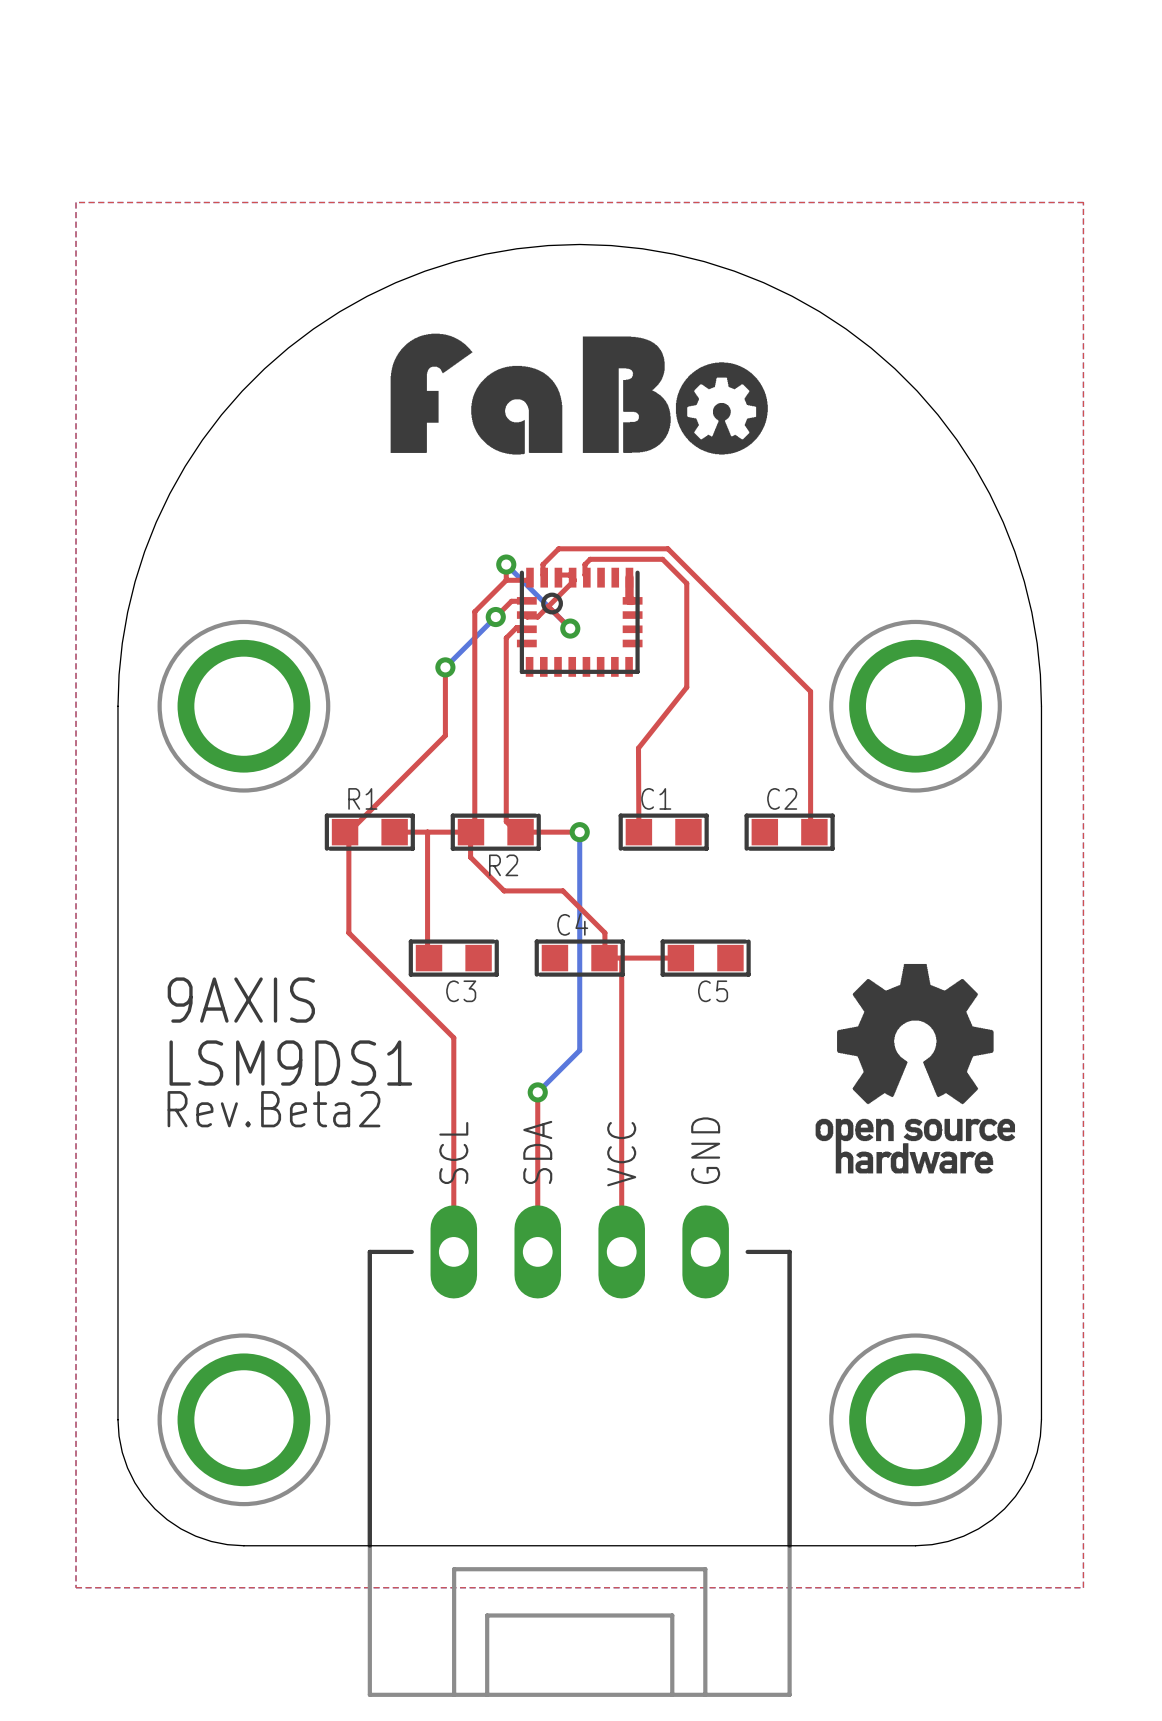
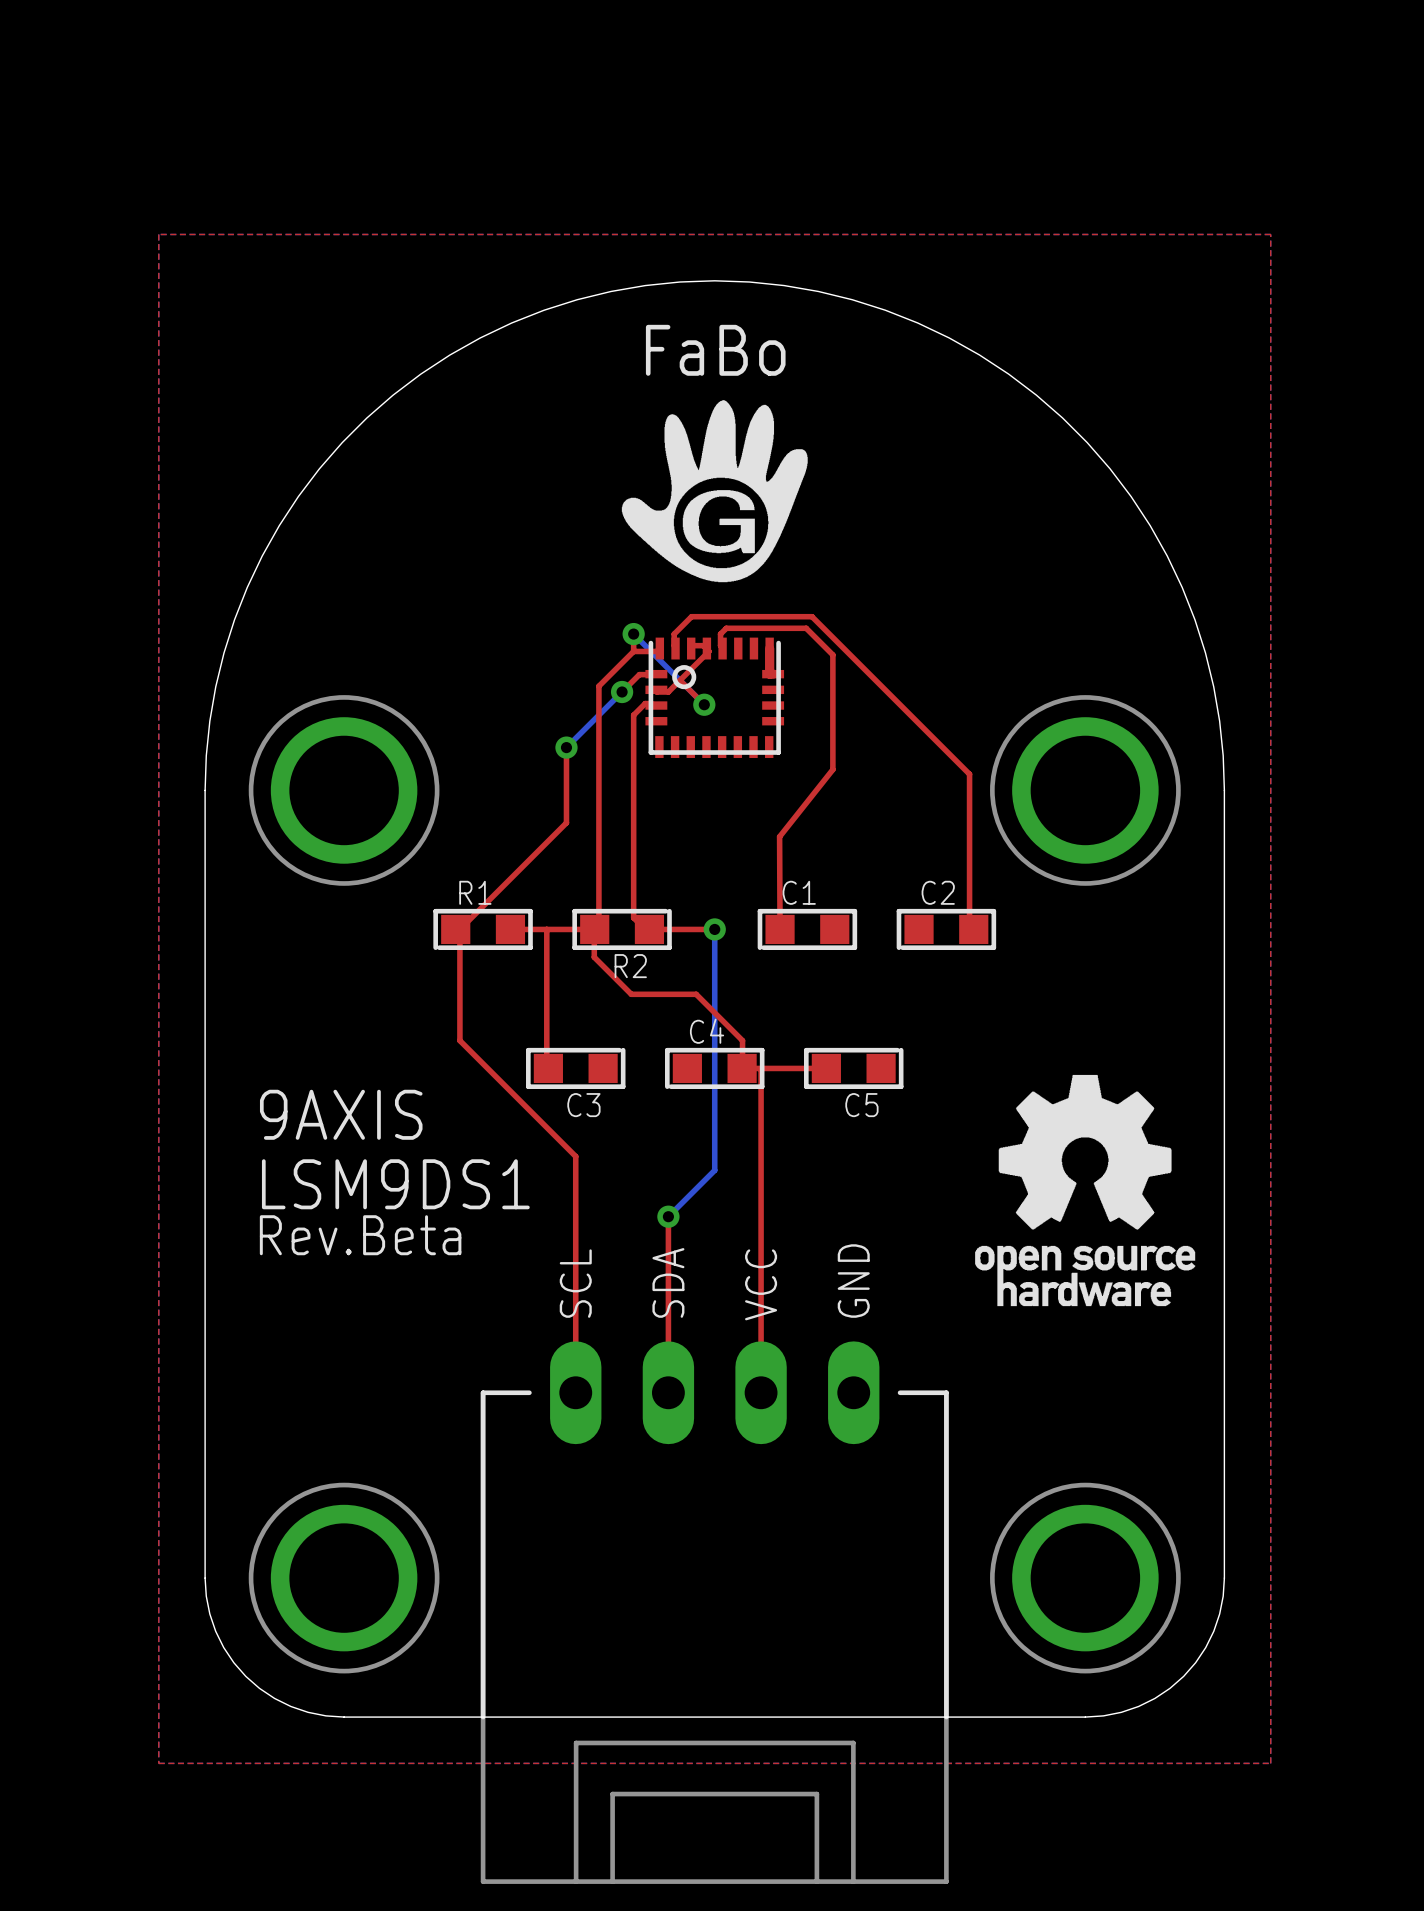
drawing: [390, 333, 768, 455] -> none
drawing: none -> [621, 400, 808, 583]
text: Rev.Beta2 (273, 1109) -> Rev.Beta (360, 1235)

